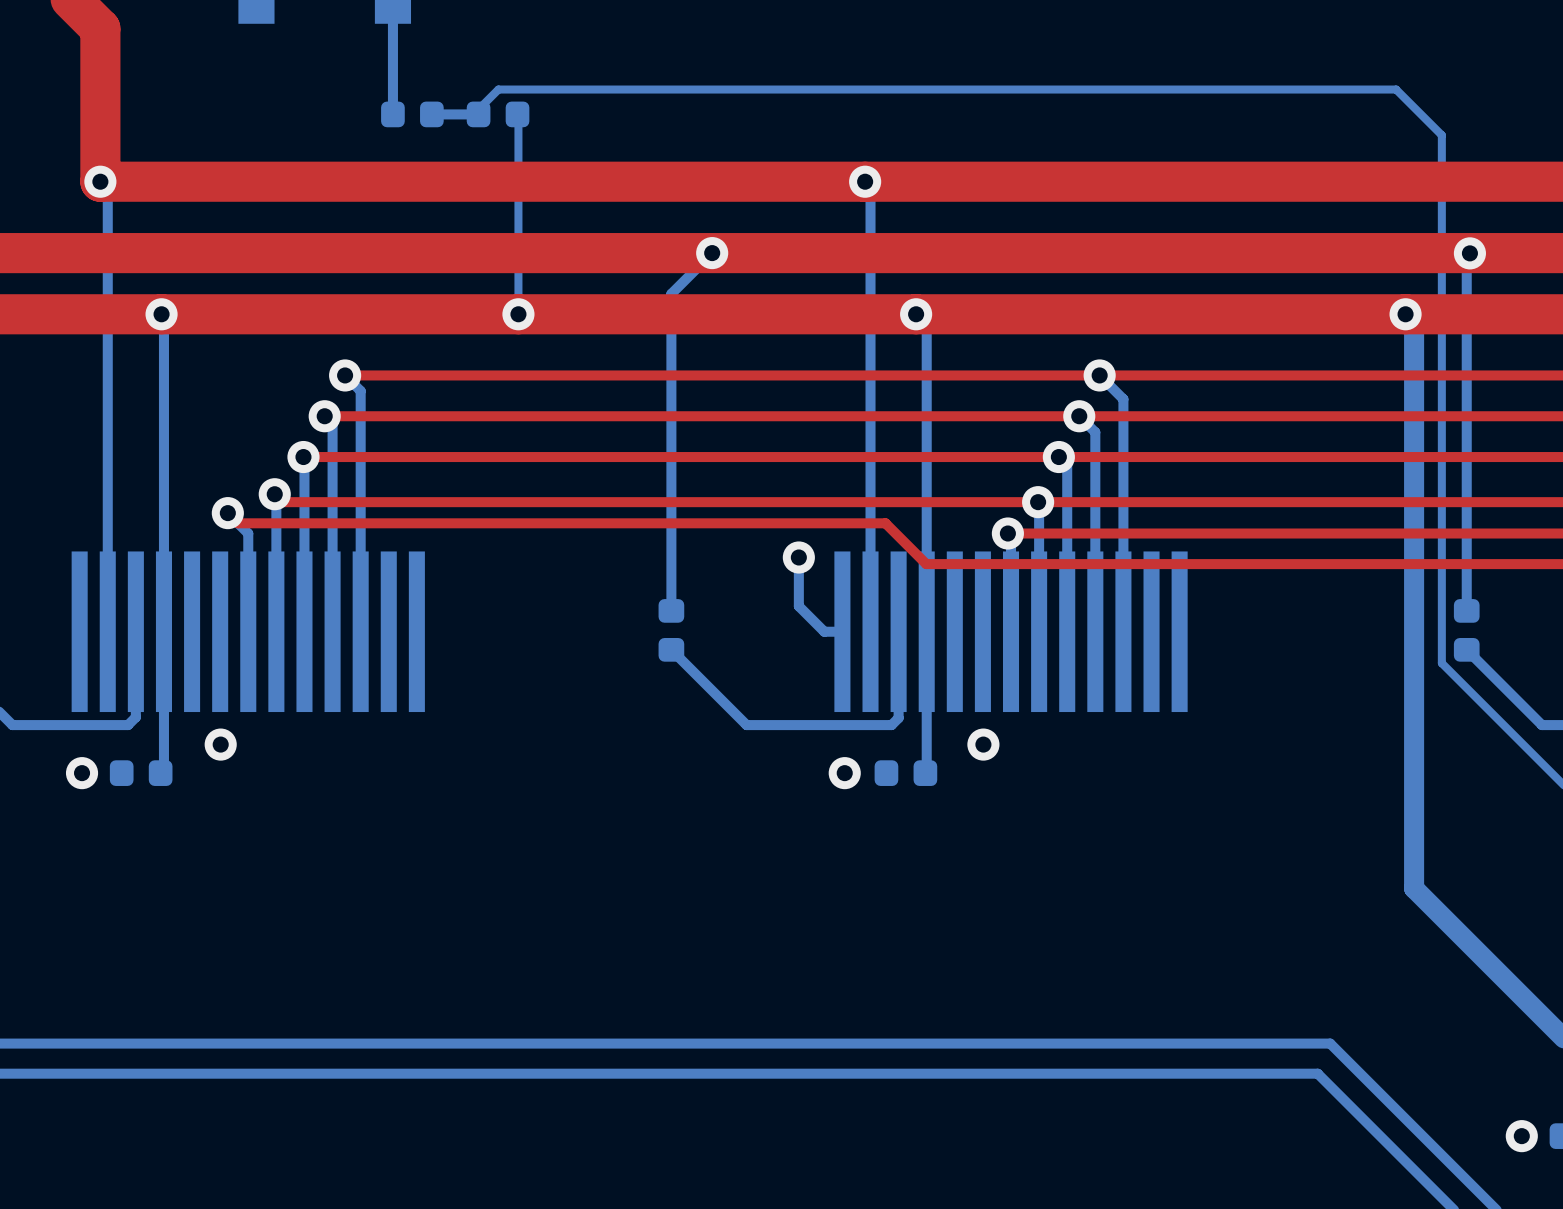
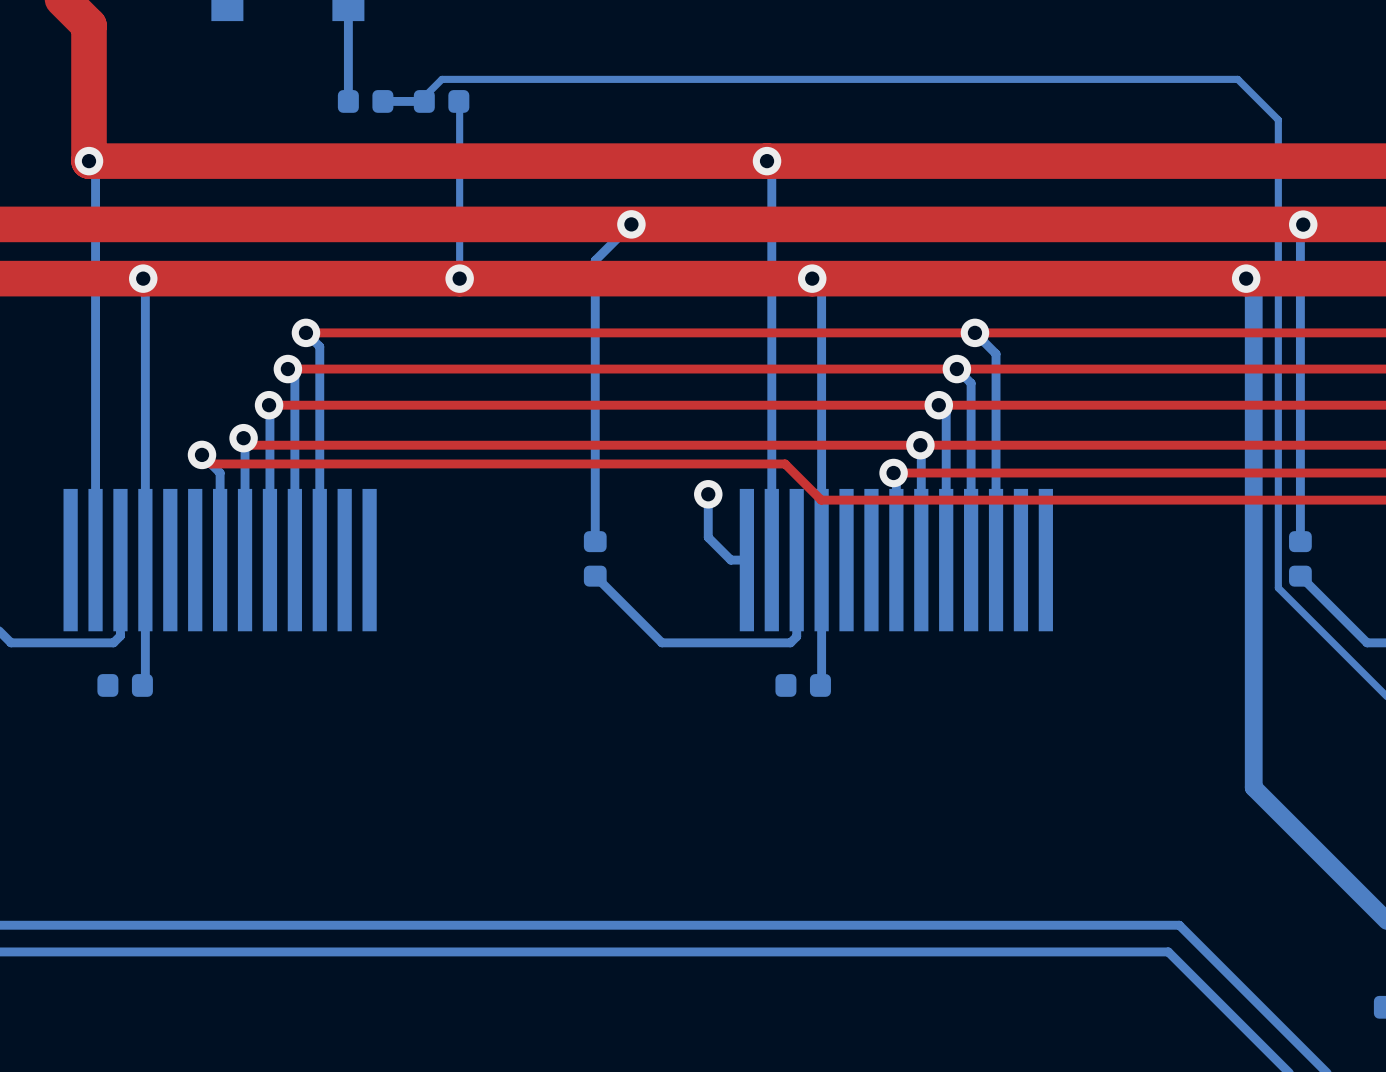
via: (220, 744) -> none
via: (983, 744) -> none
via: (82, 773) -> none
via: (844, 773) -> none
via: (1521, 1136) -> none

